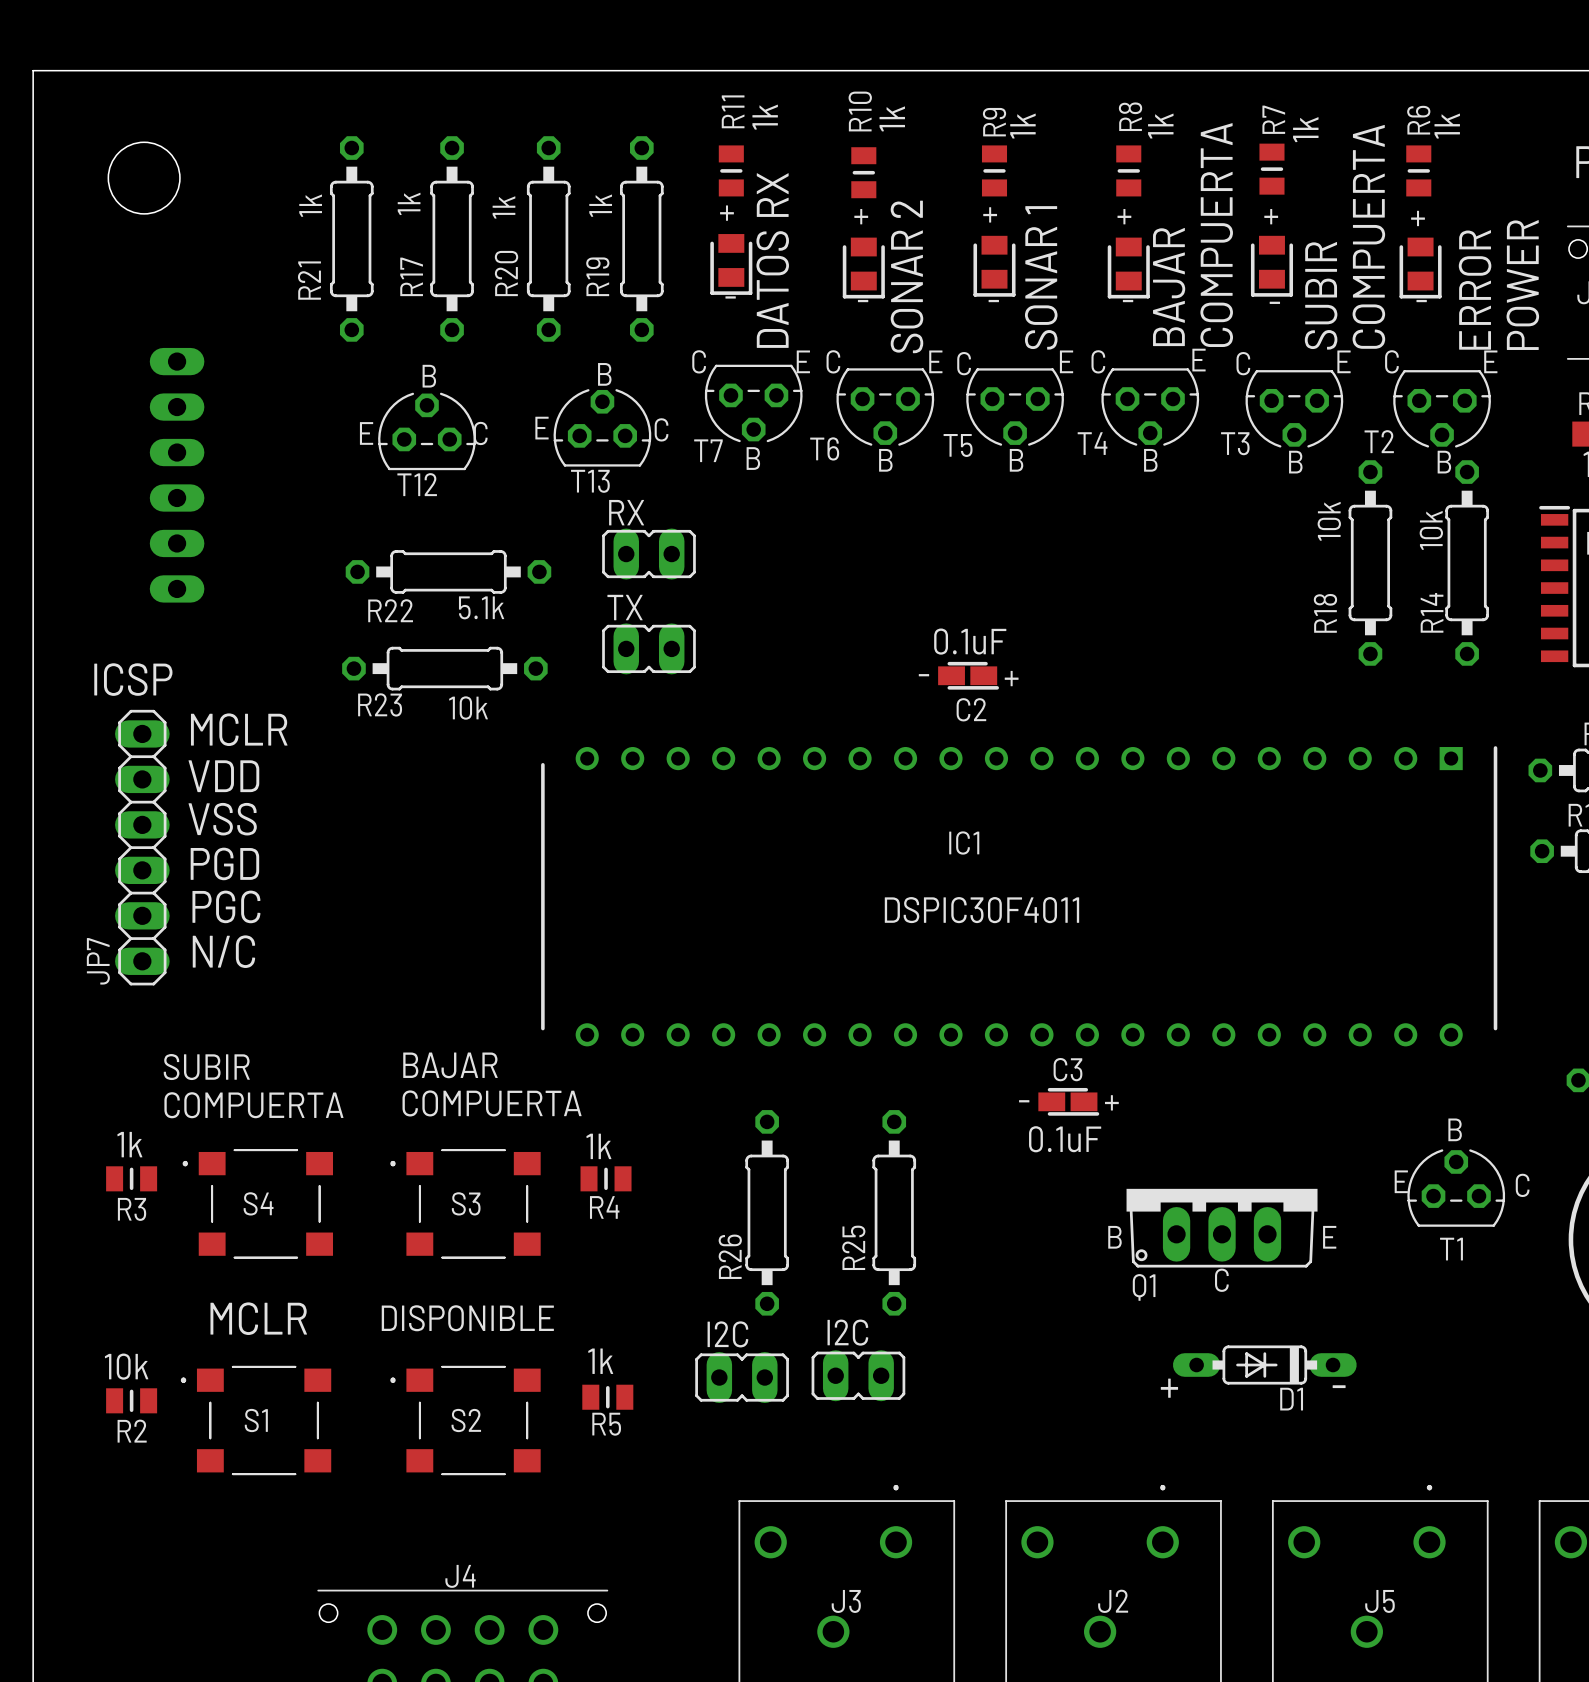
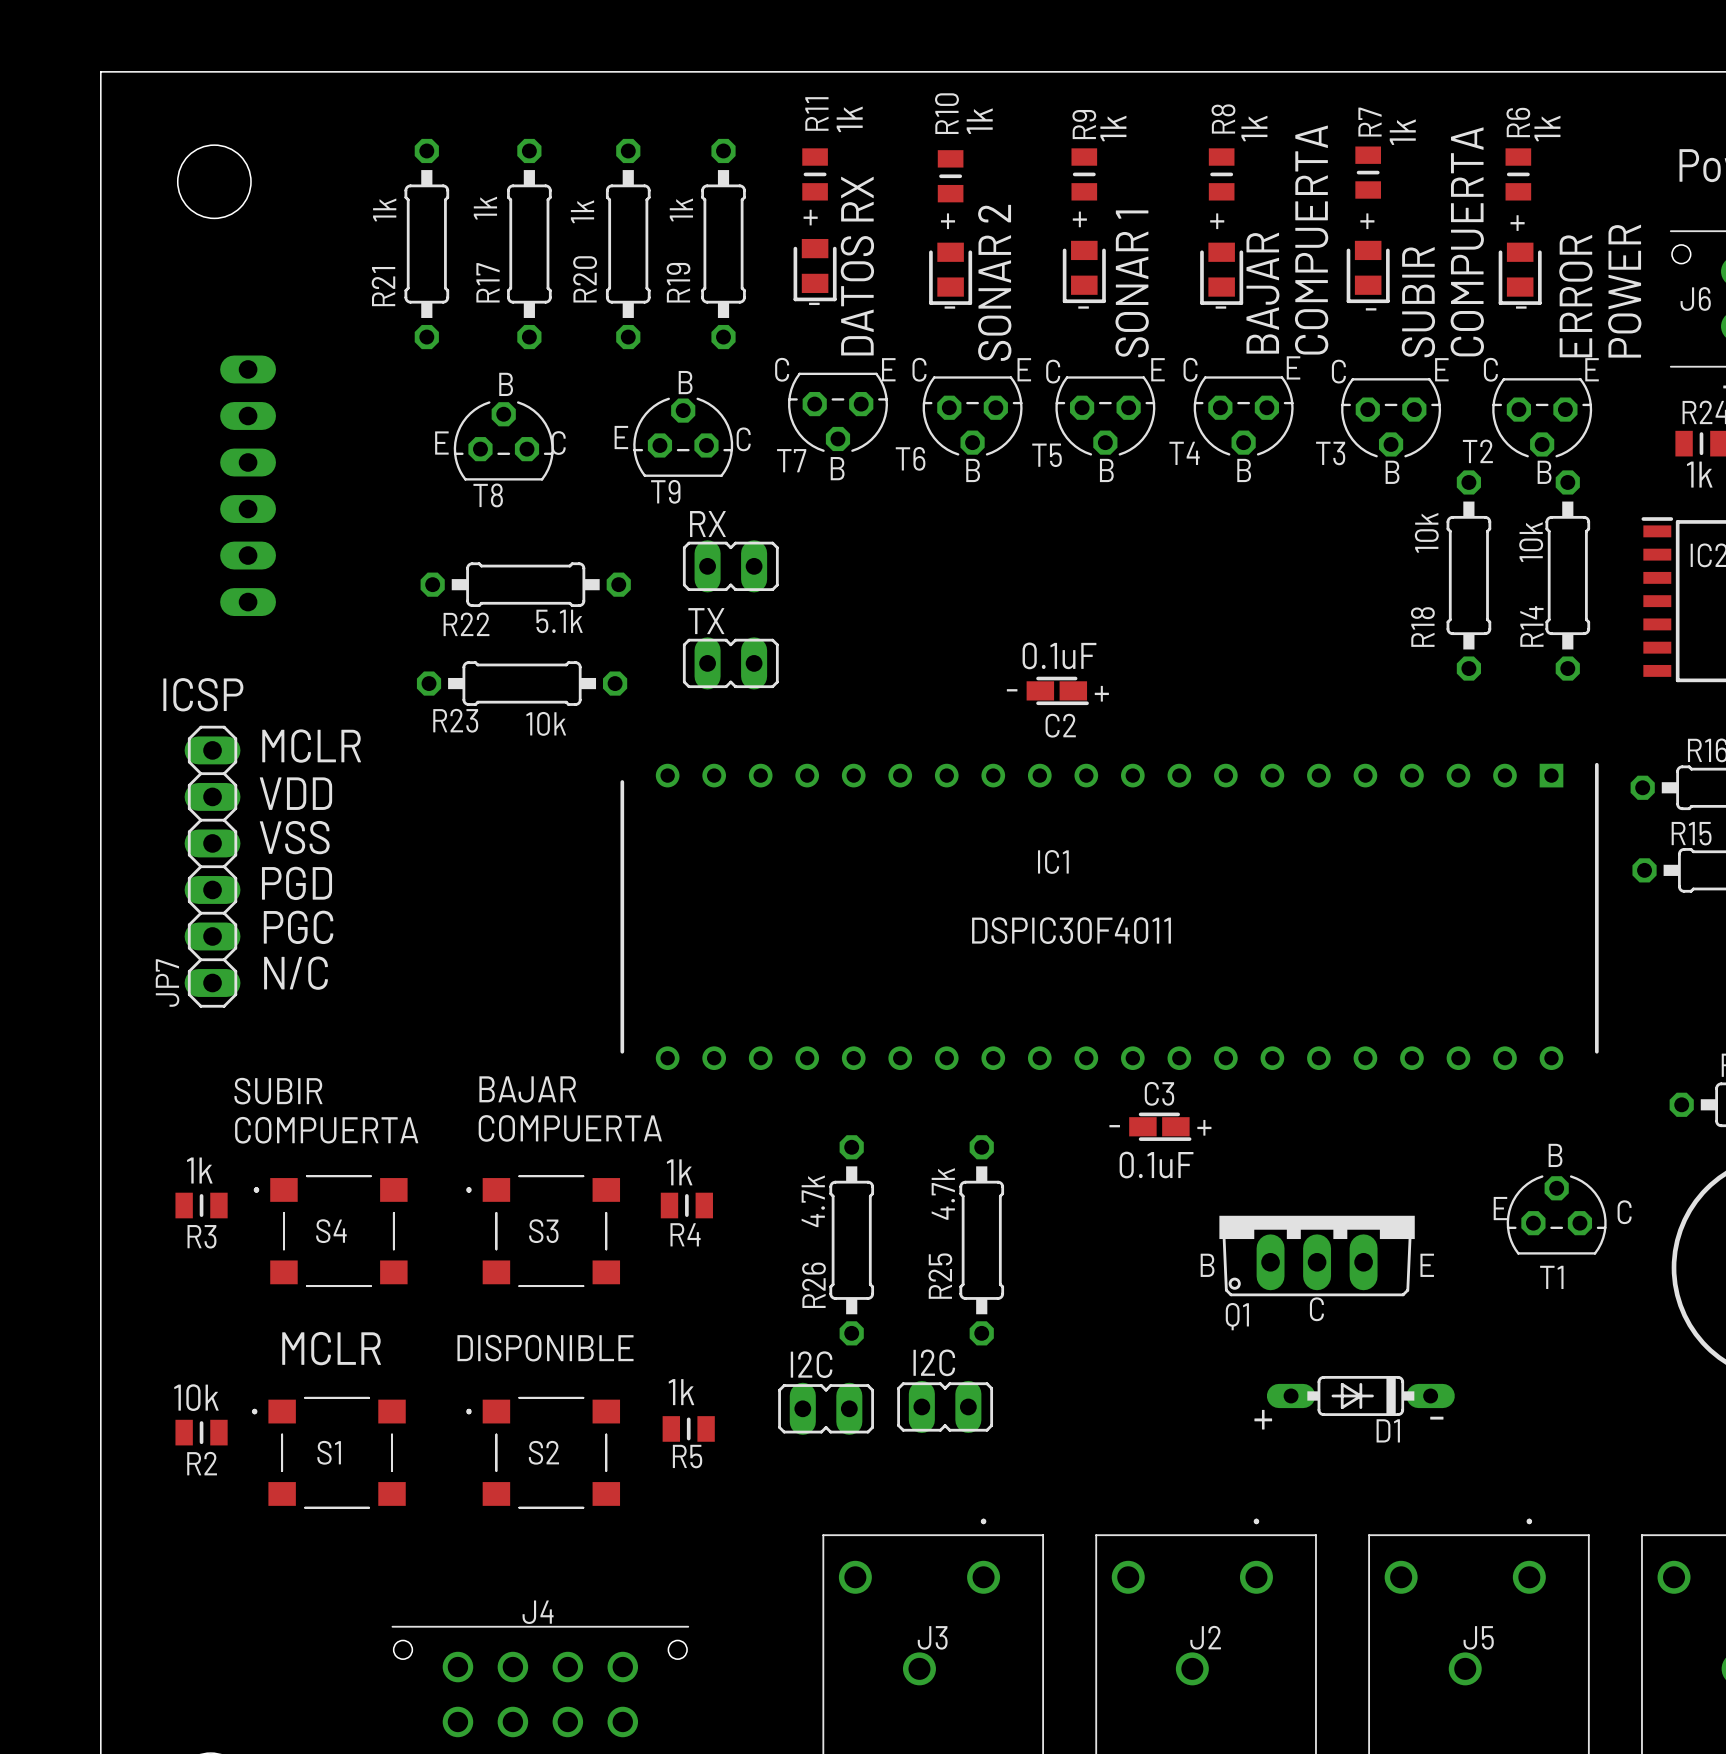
T13 name: T13 (590, 481) -> T9 (665, 491)
T12 name: T12 (417, 484) -> T8 (488, 495)
R25 value: none -> 4.7k (943, 1194)
R26 value: none -> 4.7k (813, 1201)

